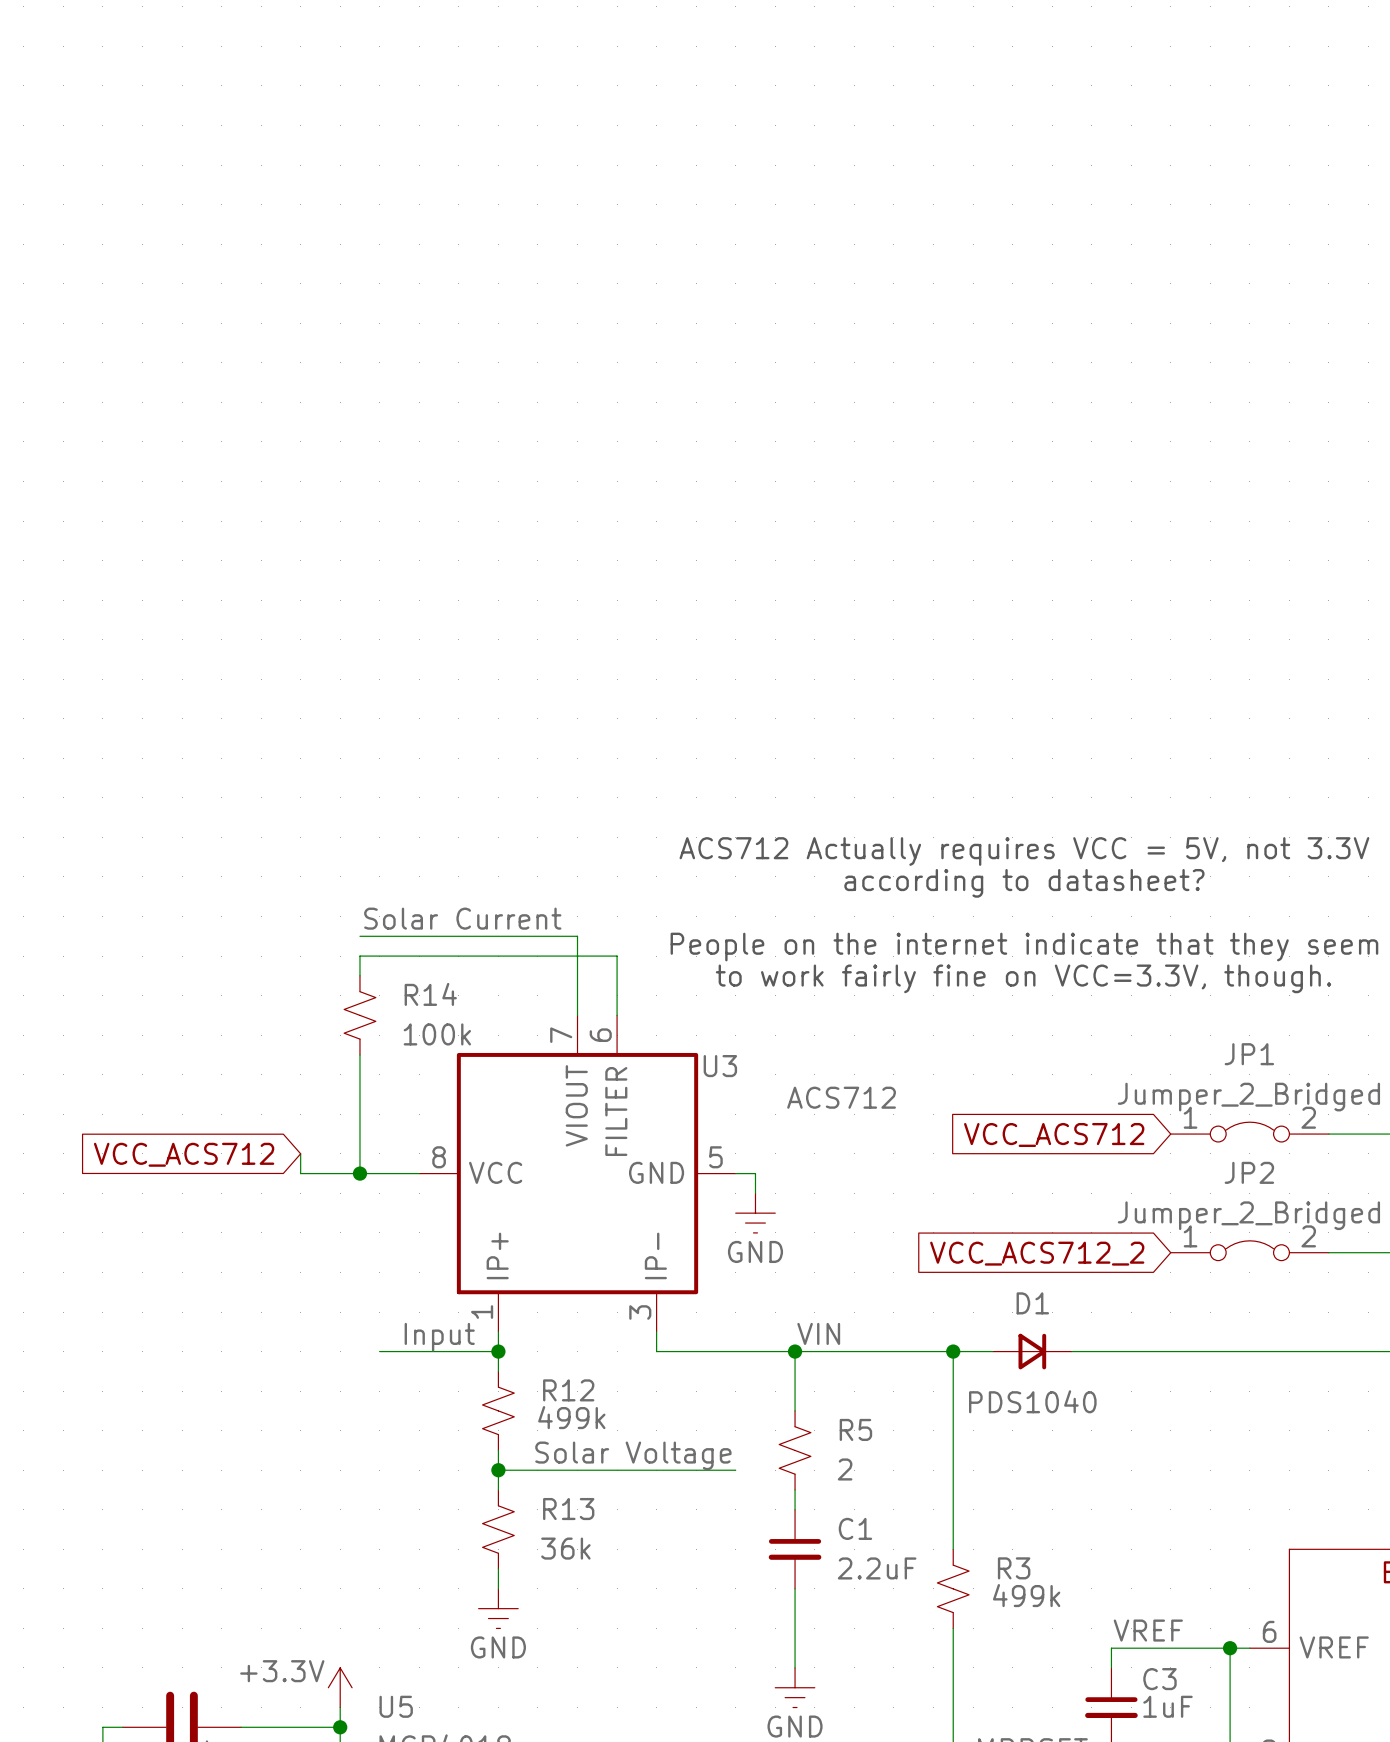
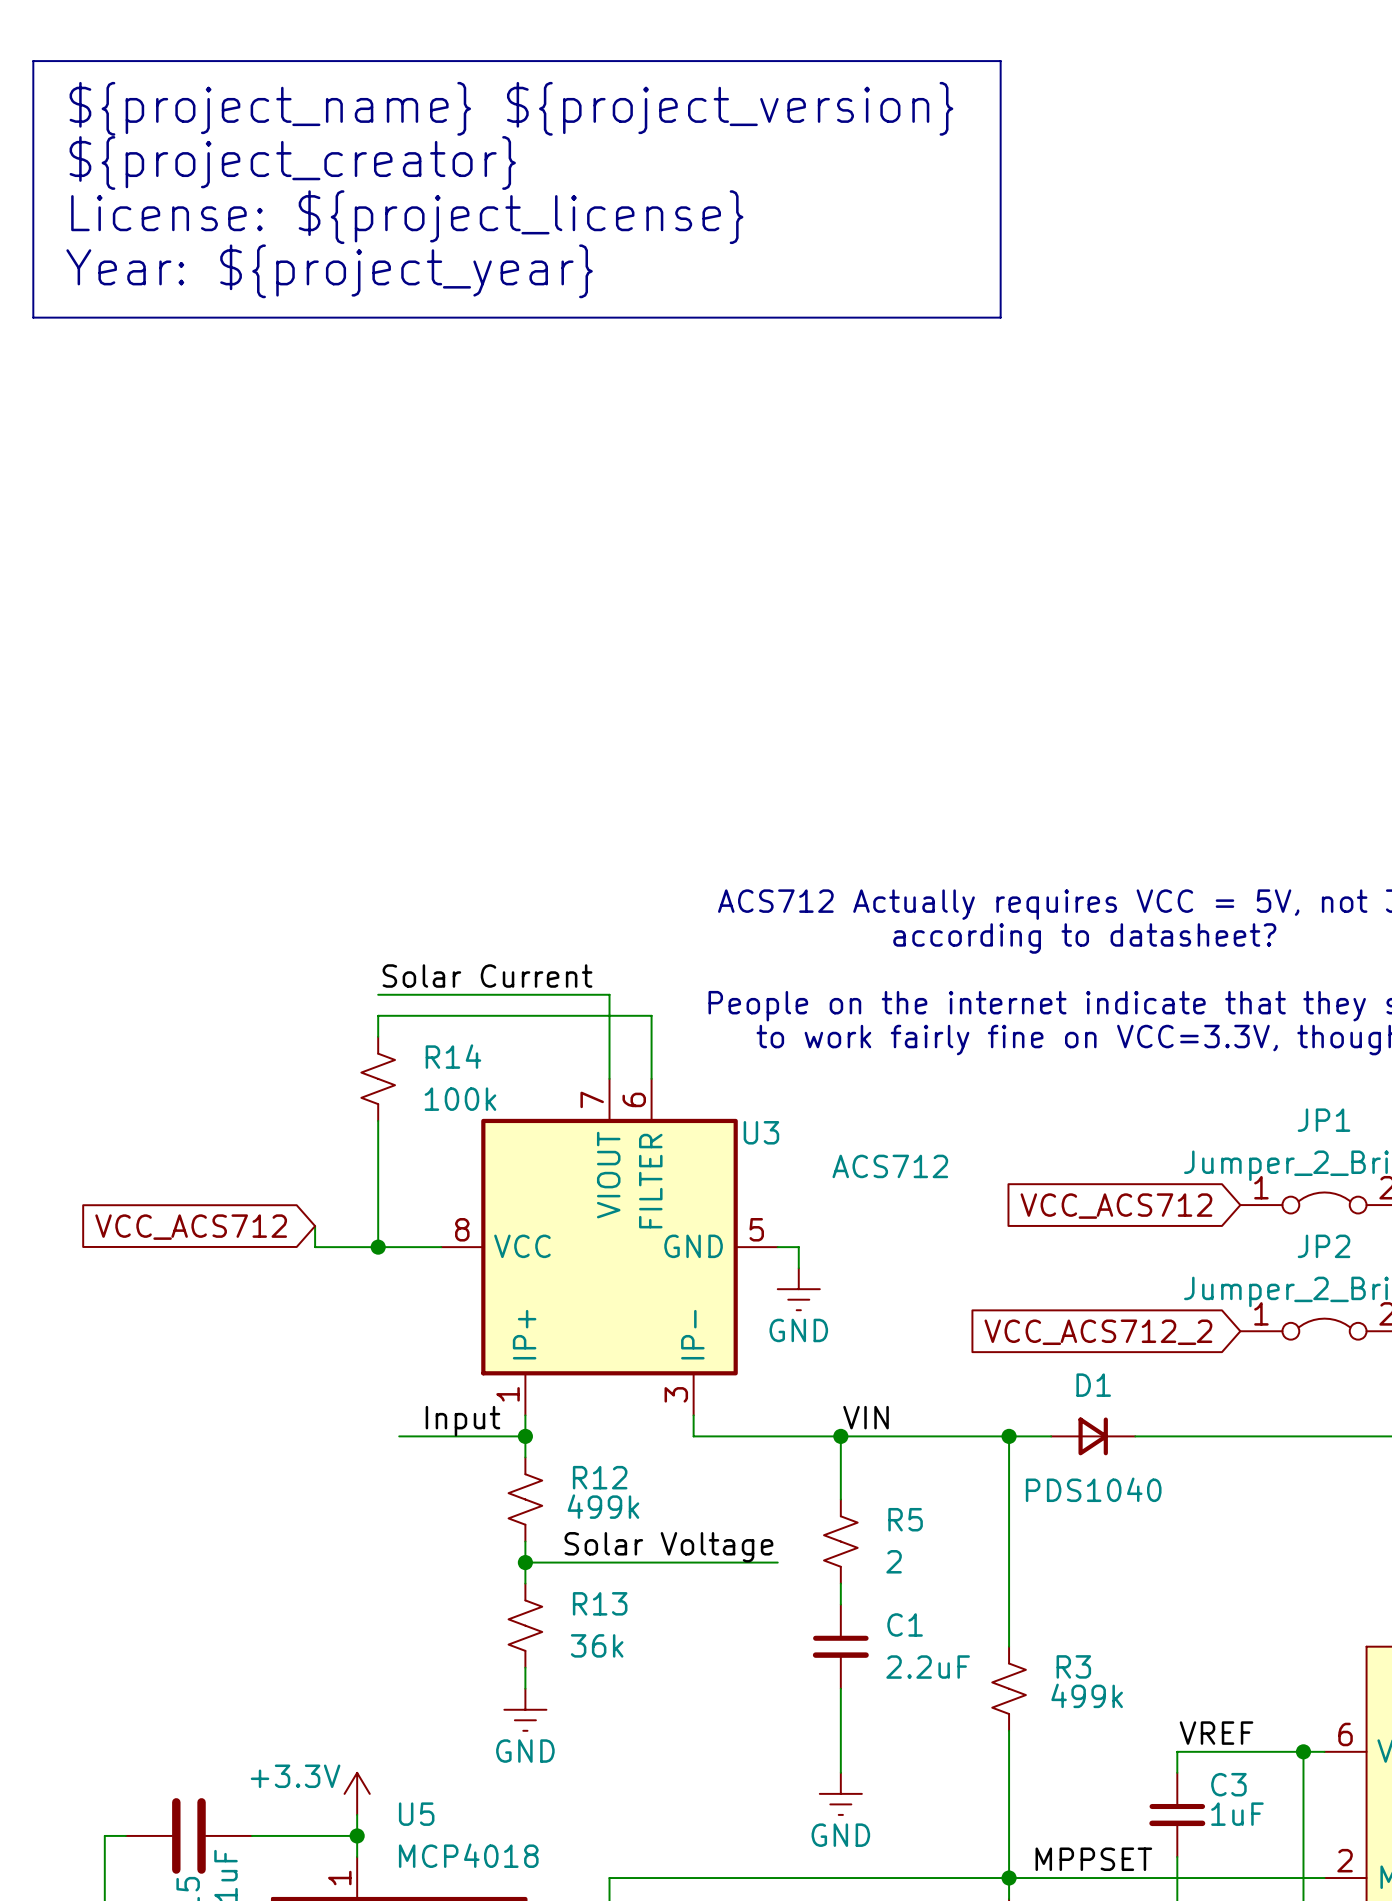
line: none -> (33, 61) (1000, 61) (1000, 317) (33, 317) (33, 61)
text: none -> ${project_name} ${project_version} (511, 108)
text: none -> ${project_creator} (292, 162)
text: none -> License: ${project_license} (407, 217)
text: none -> Year: ${project_year} (329, 271)

